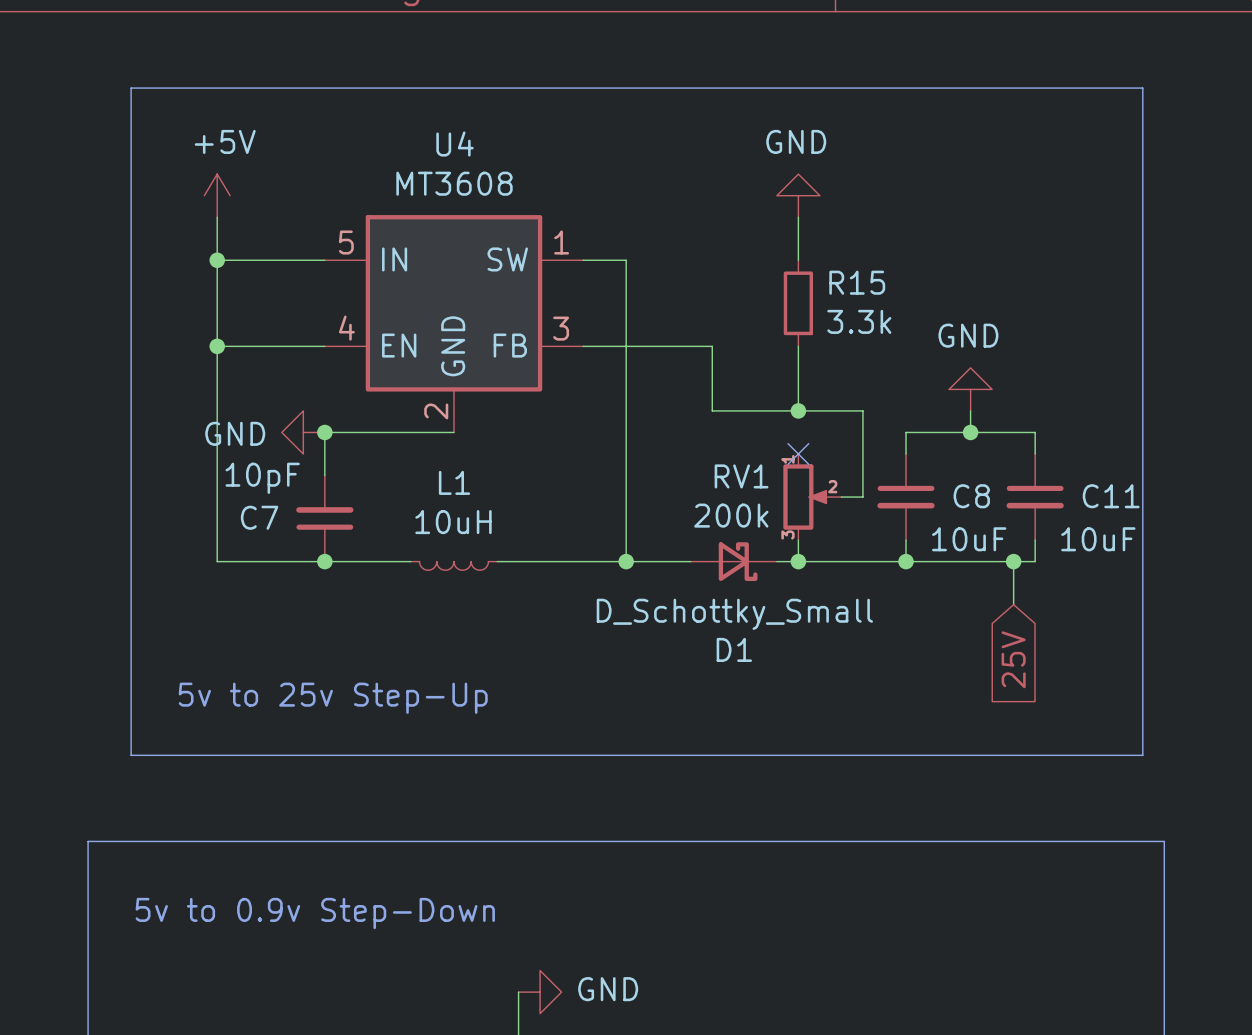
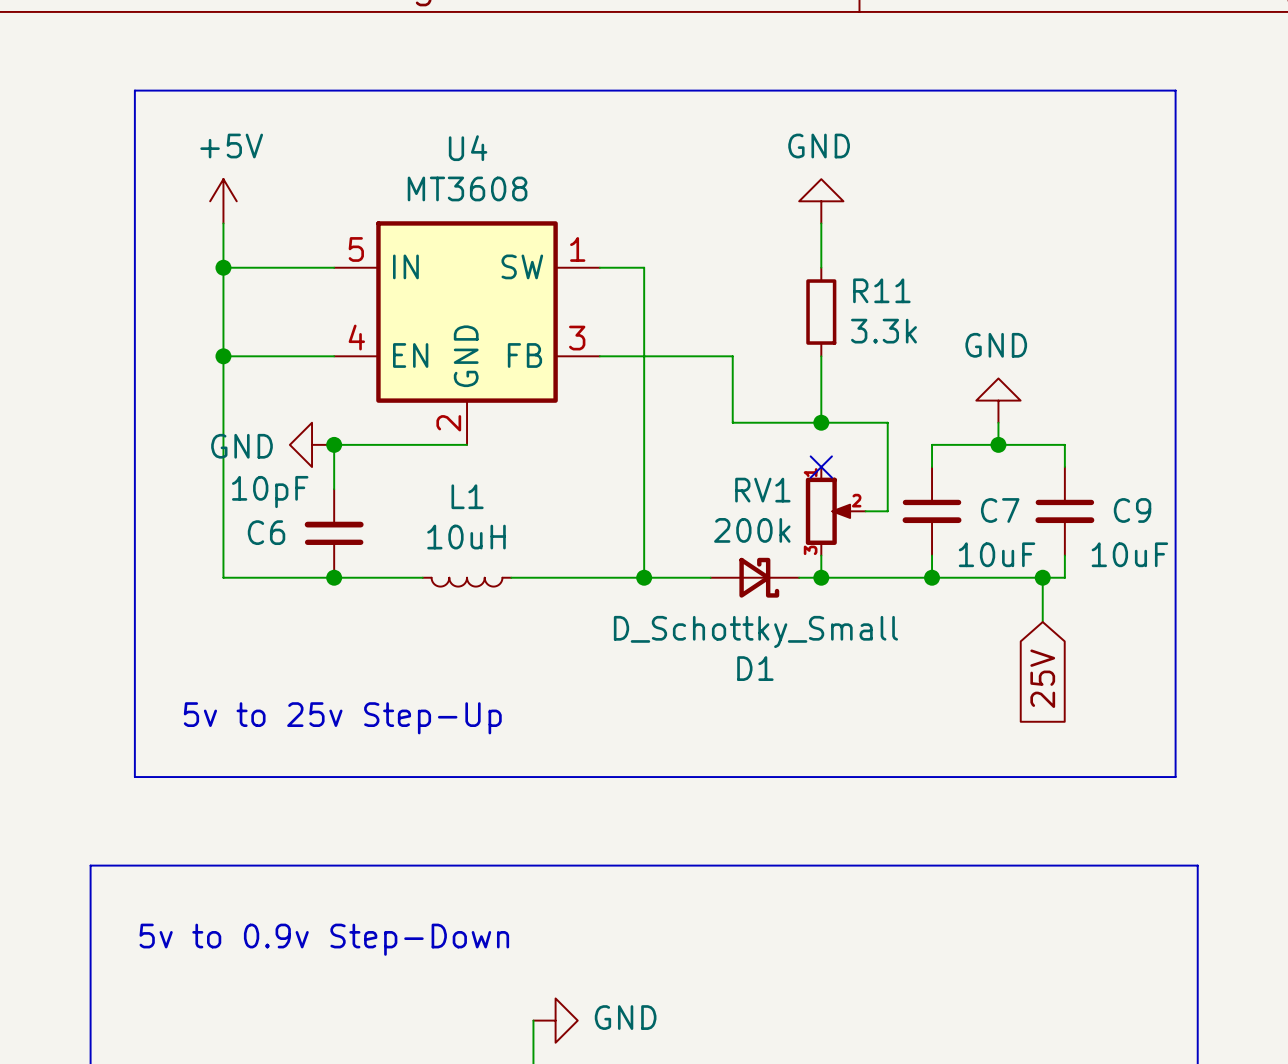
R15 name: R15 (857, 282) -> R11 (881, 290)
C8 name: C8 (971, 496) -> C7 (1000, 510)
C11 name: C11 (1111, 496) -> C9 (1132, 510)
C7 name: C7 (259, 517) -> C6 (266, 532)

